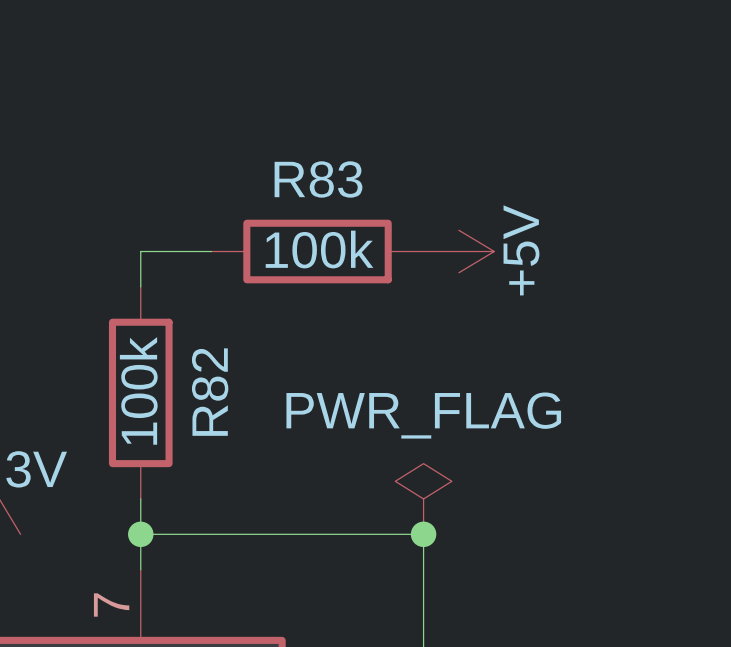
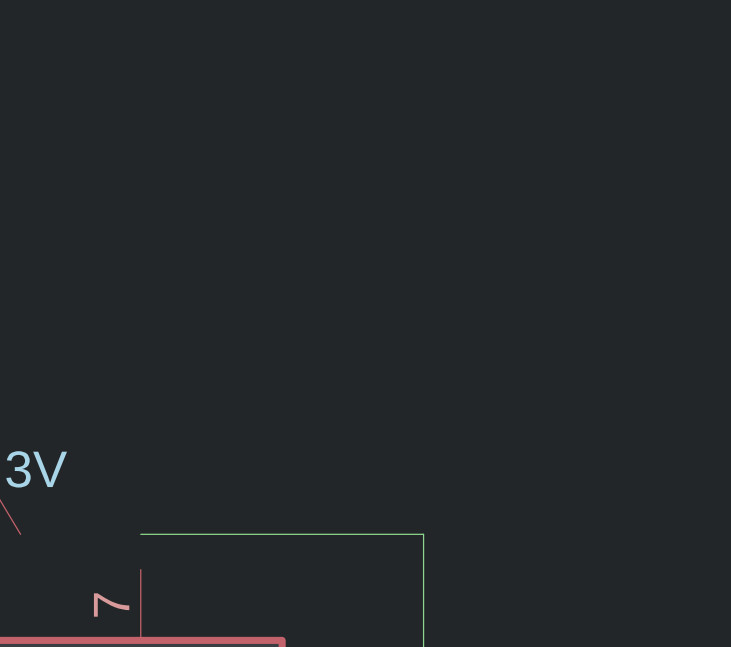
wire: (211, 251) (140, 251) (140, 286) -> none
R83: 100k (317, 251) -> none
power symbol: +5V (458, 251) -> none
R82: 100k (140, 392) -> none
wire: (140, 498) (140, 569) -> none
power symbol: PWR_FLAG (423, 498) -> none
junction: (140, 534) -> none
junction: (423, 534) -> none

